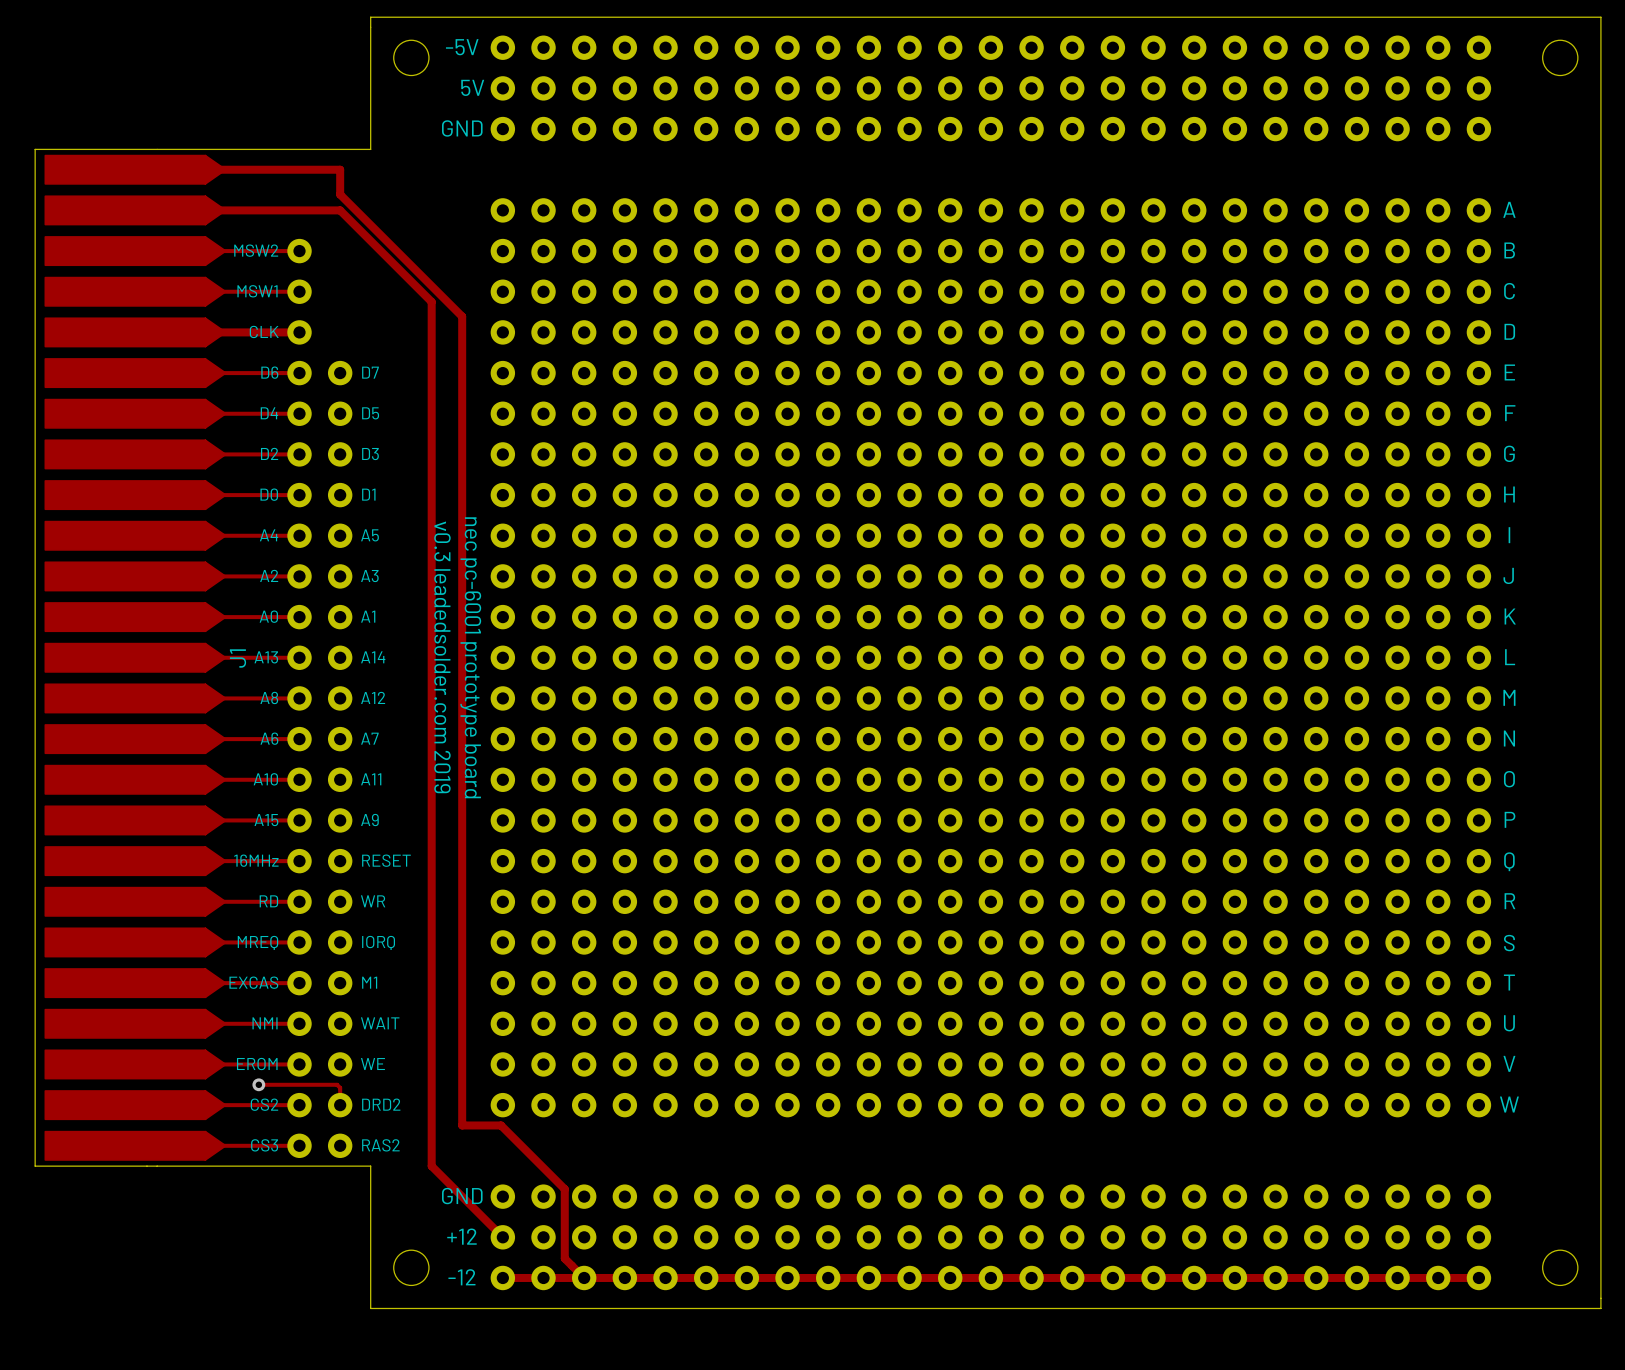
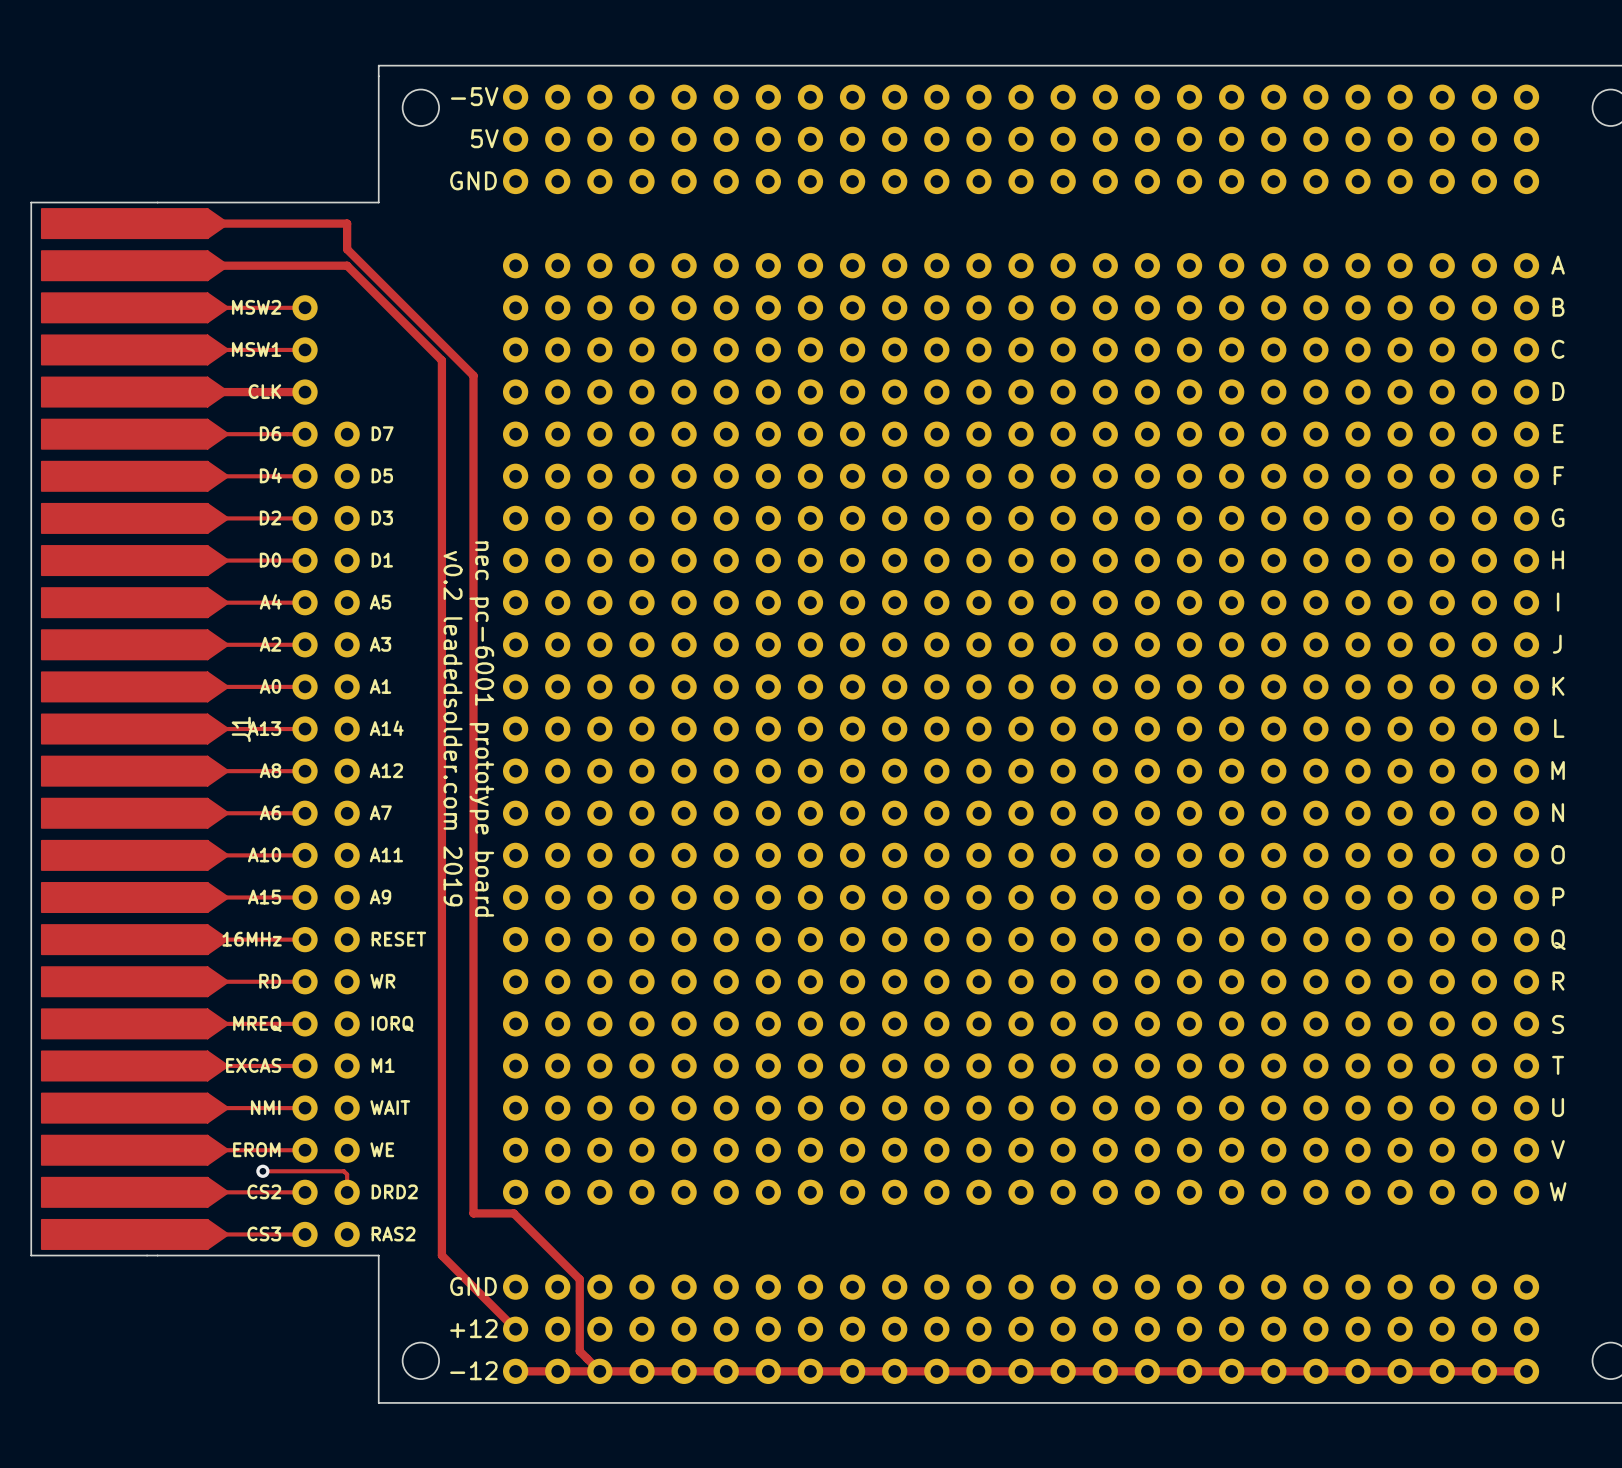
text: v0.3 leadedsolder.com 2019 (442, 657) -> v0.2 leadedsolder.com 2019 (453, 728)

